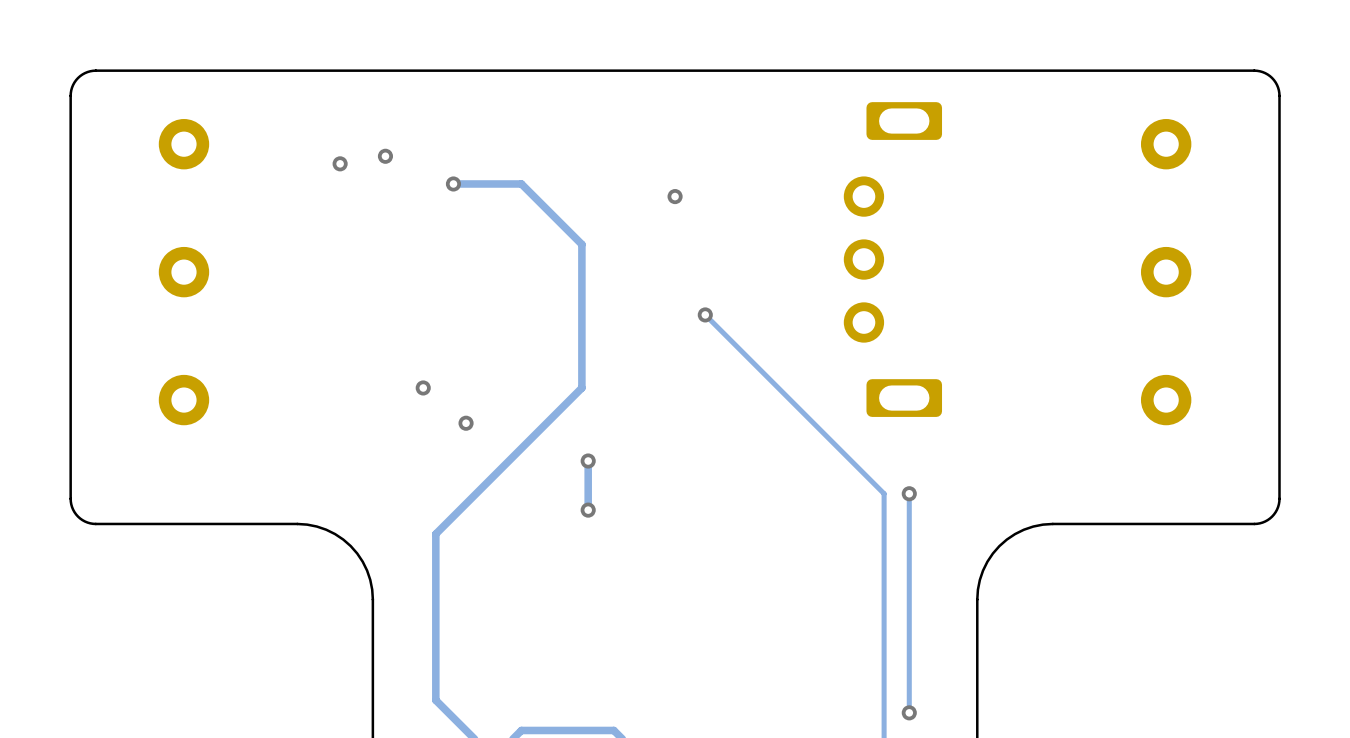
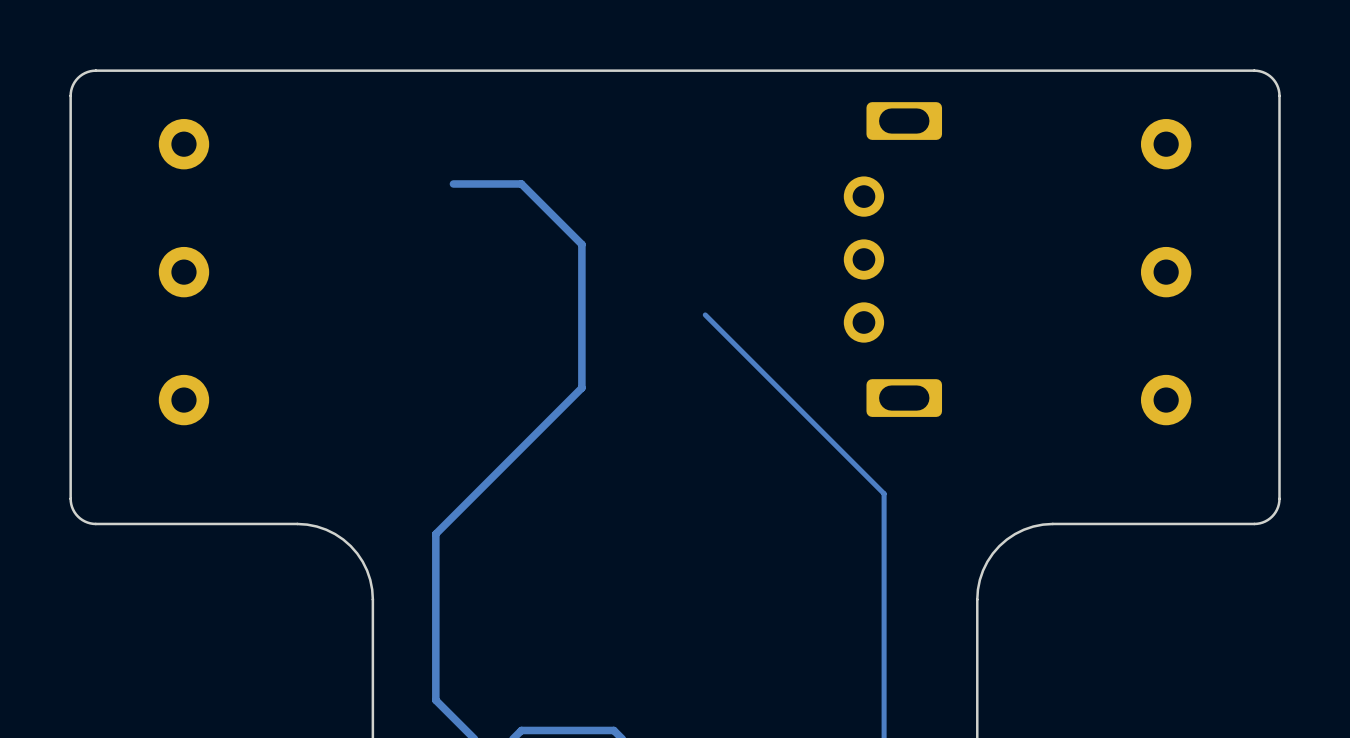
via: (385, 156) -> none
via: (340, 163) -> none
via: (453, 183) -> none
via: (675, 196) -> none
via: (705, 314) -> none
via: (423, 387) -> none
via: (466, 423) -> none
track: (588, 461) (588, 510) -> none
via: (588, 461) -> none
track: (909, 493) (909, 712) -> none
via: (909, 493) -> none
via: (588, 510) -> none
via: (909, 712) -> none

